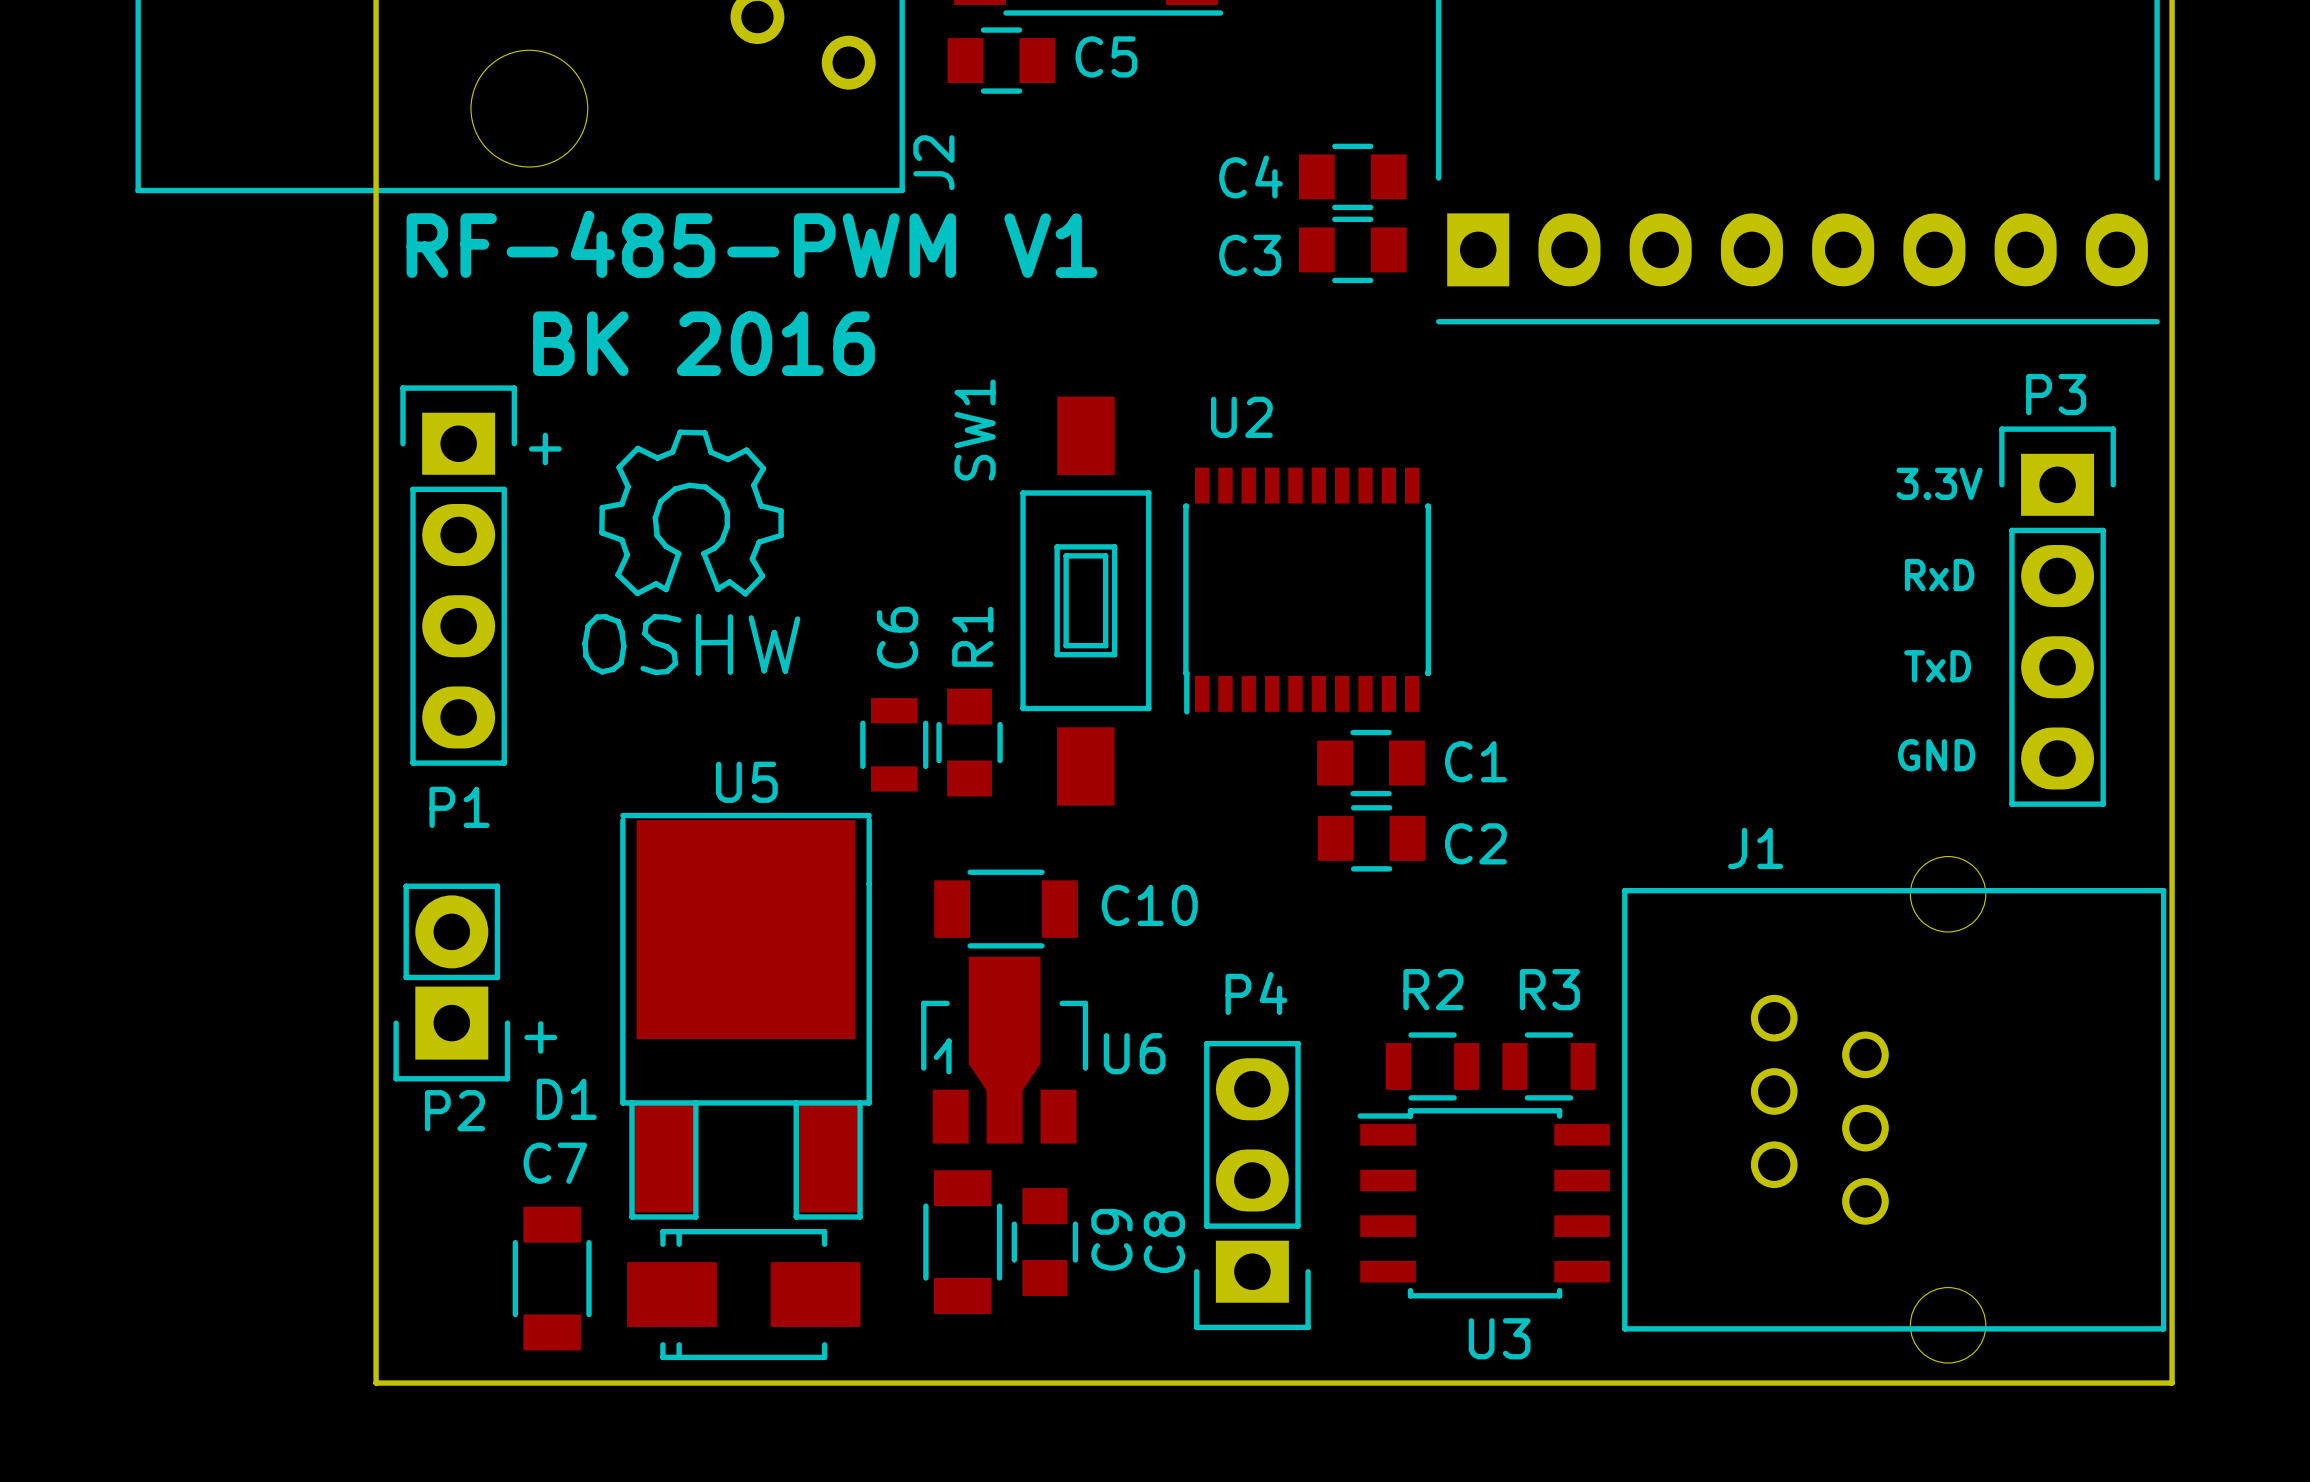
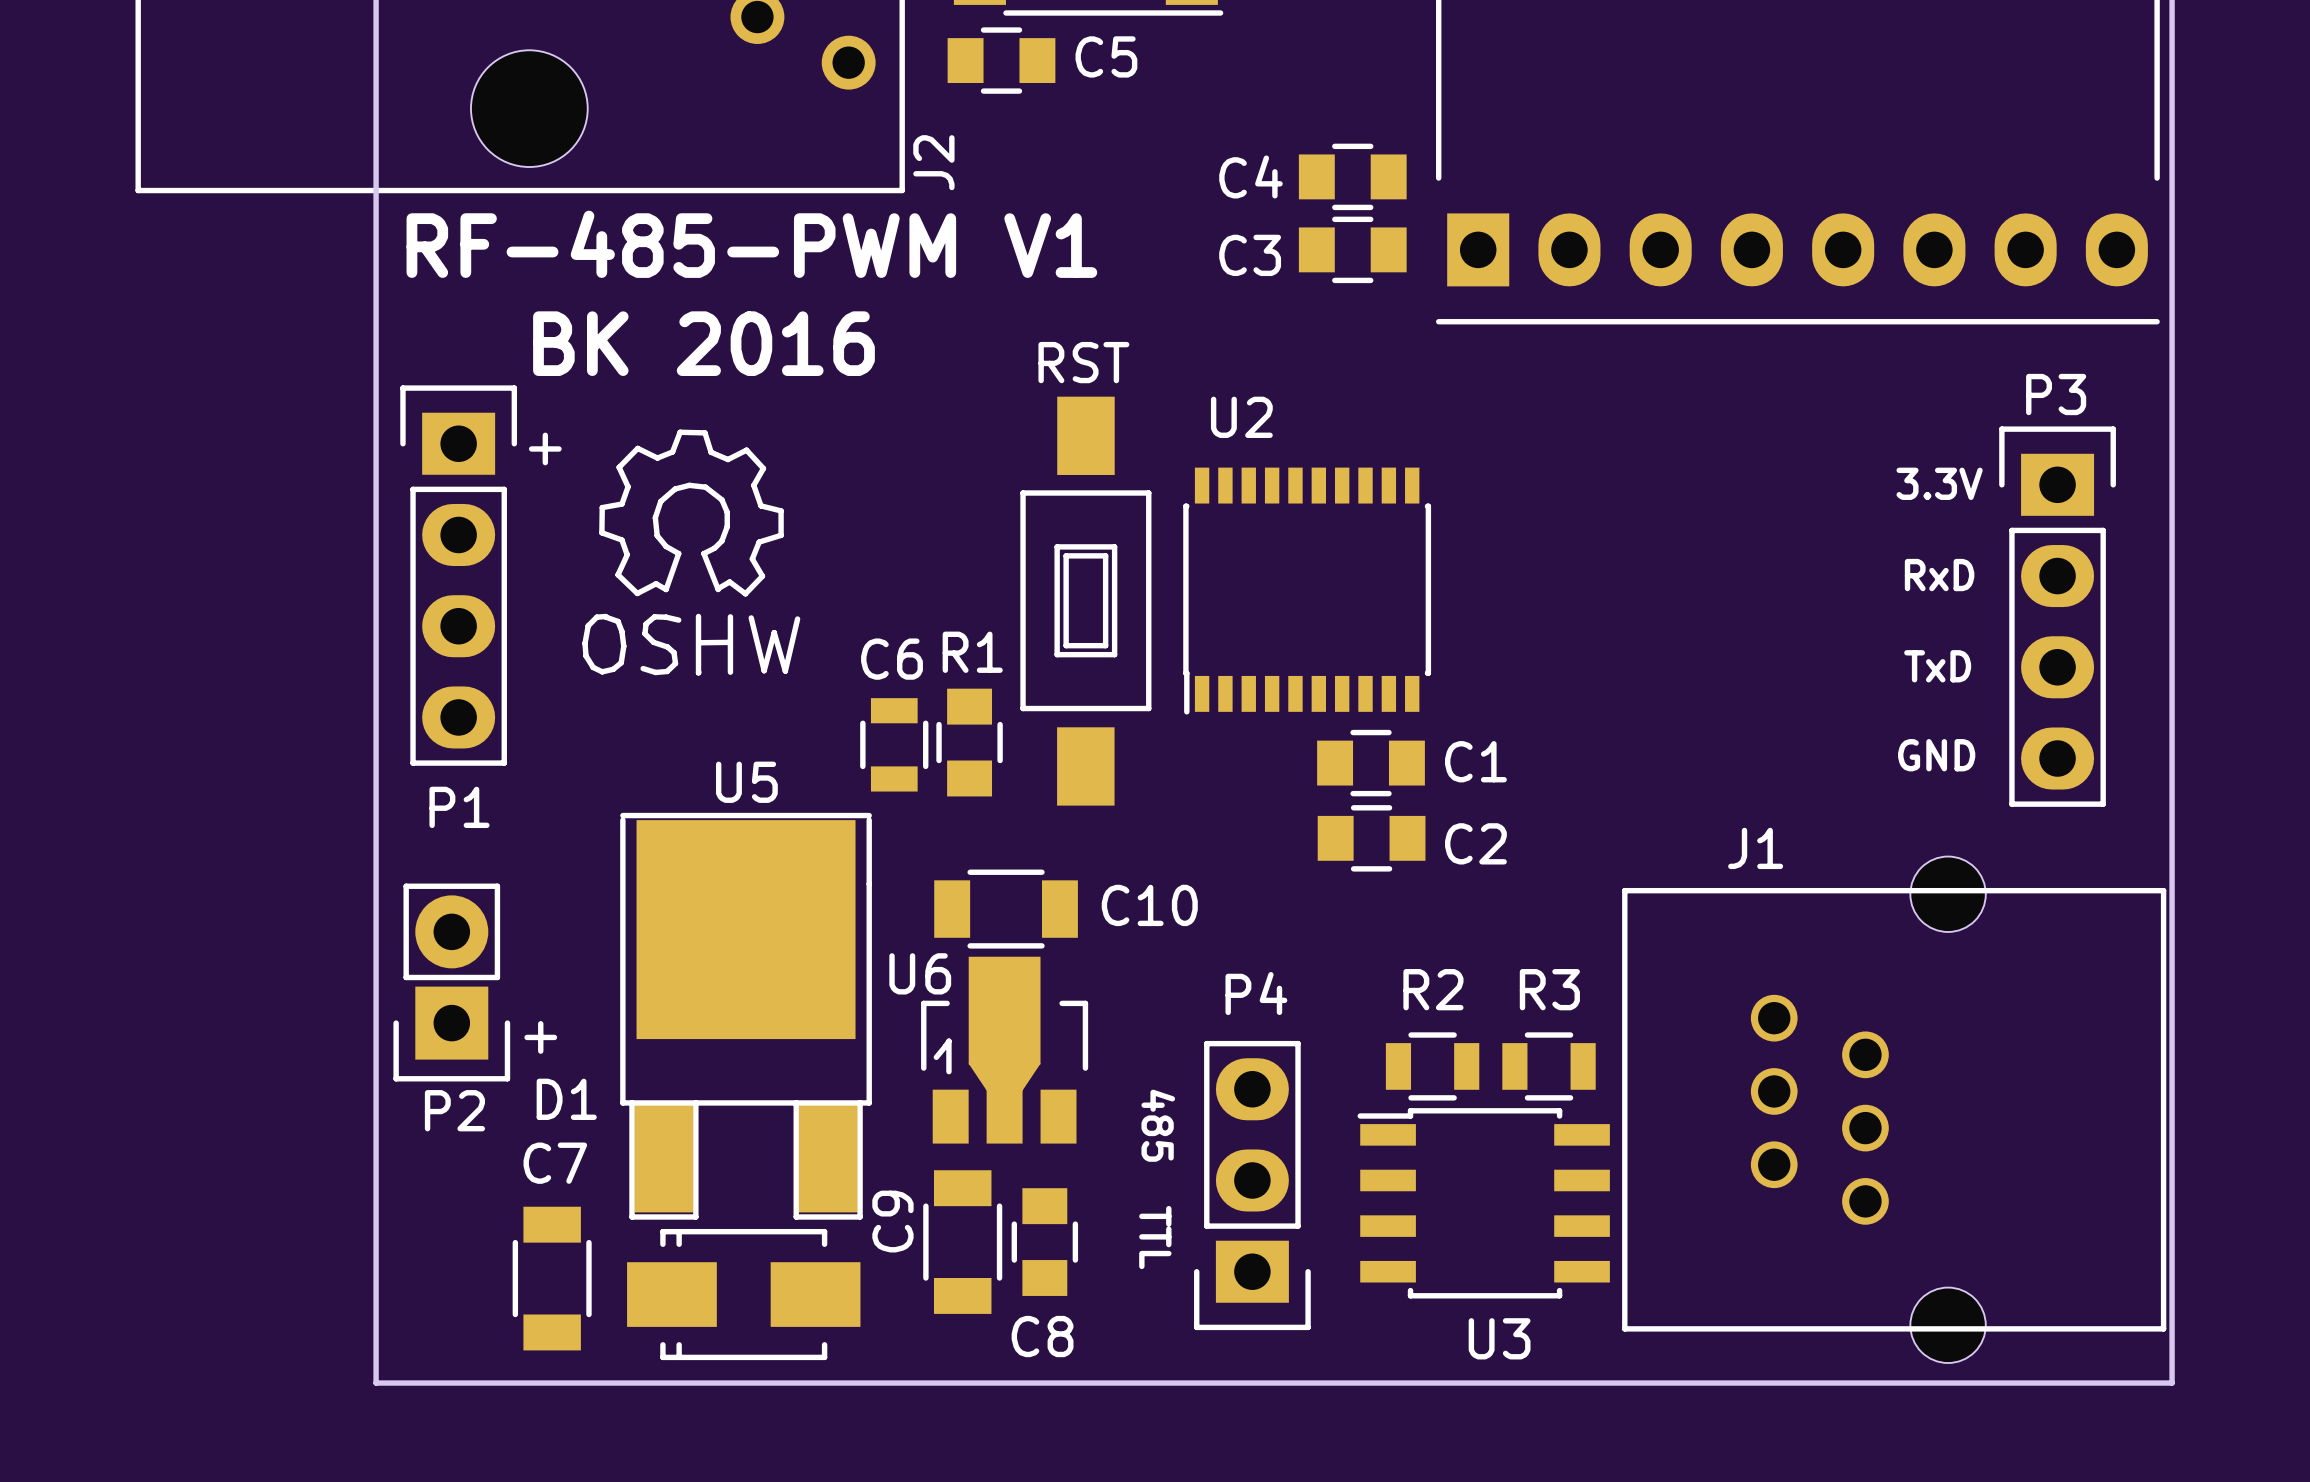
SW1 name: SW1 (975, 430) -> RST (1083, 362)
R1 name rotation: 0° (972, 636) -> 90° clockwise (972, 652)
C6 name rotation: 0° (897, 637) -> 90° clockwise (892, 659)
U6 name position: U6 (1134, 1053) -> U6 (920, 973)
text: none -> 485 (1158, 1125)
text: none -> TTL (1155, 1237)
C9 name position: C9 (1111, 1239) -> C9 (892, 1221)
C8 name rotation: 0° (1164, 1242) -> 90° clockwise (1042, 1336)
C8 name position: C8 (1164, 1242) -> C8 (1042, 1336)

